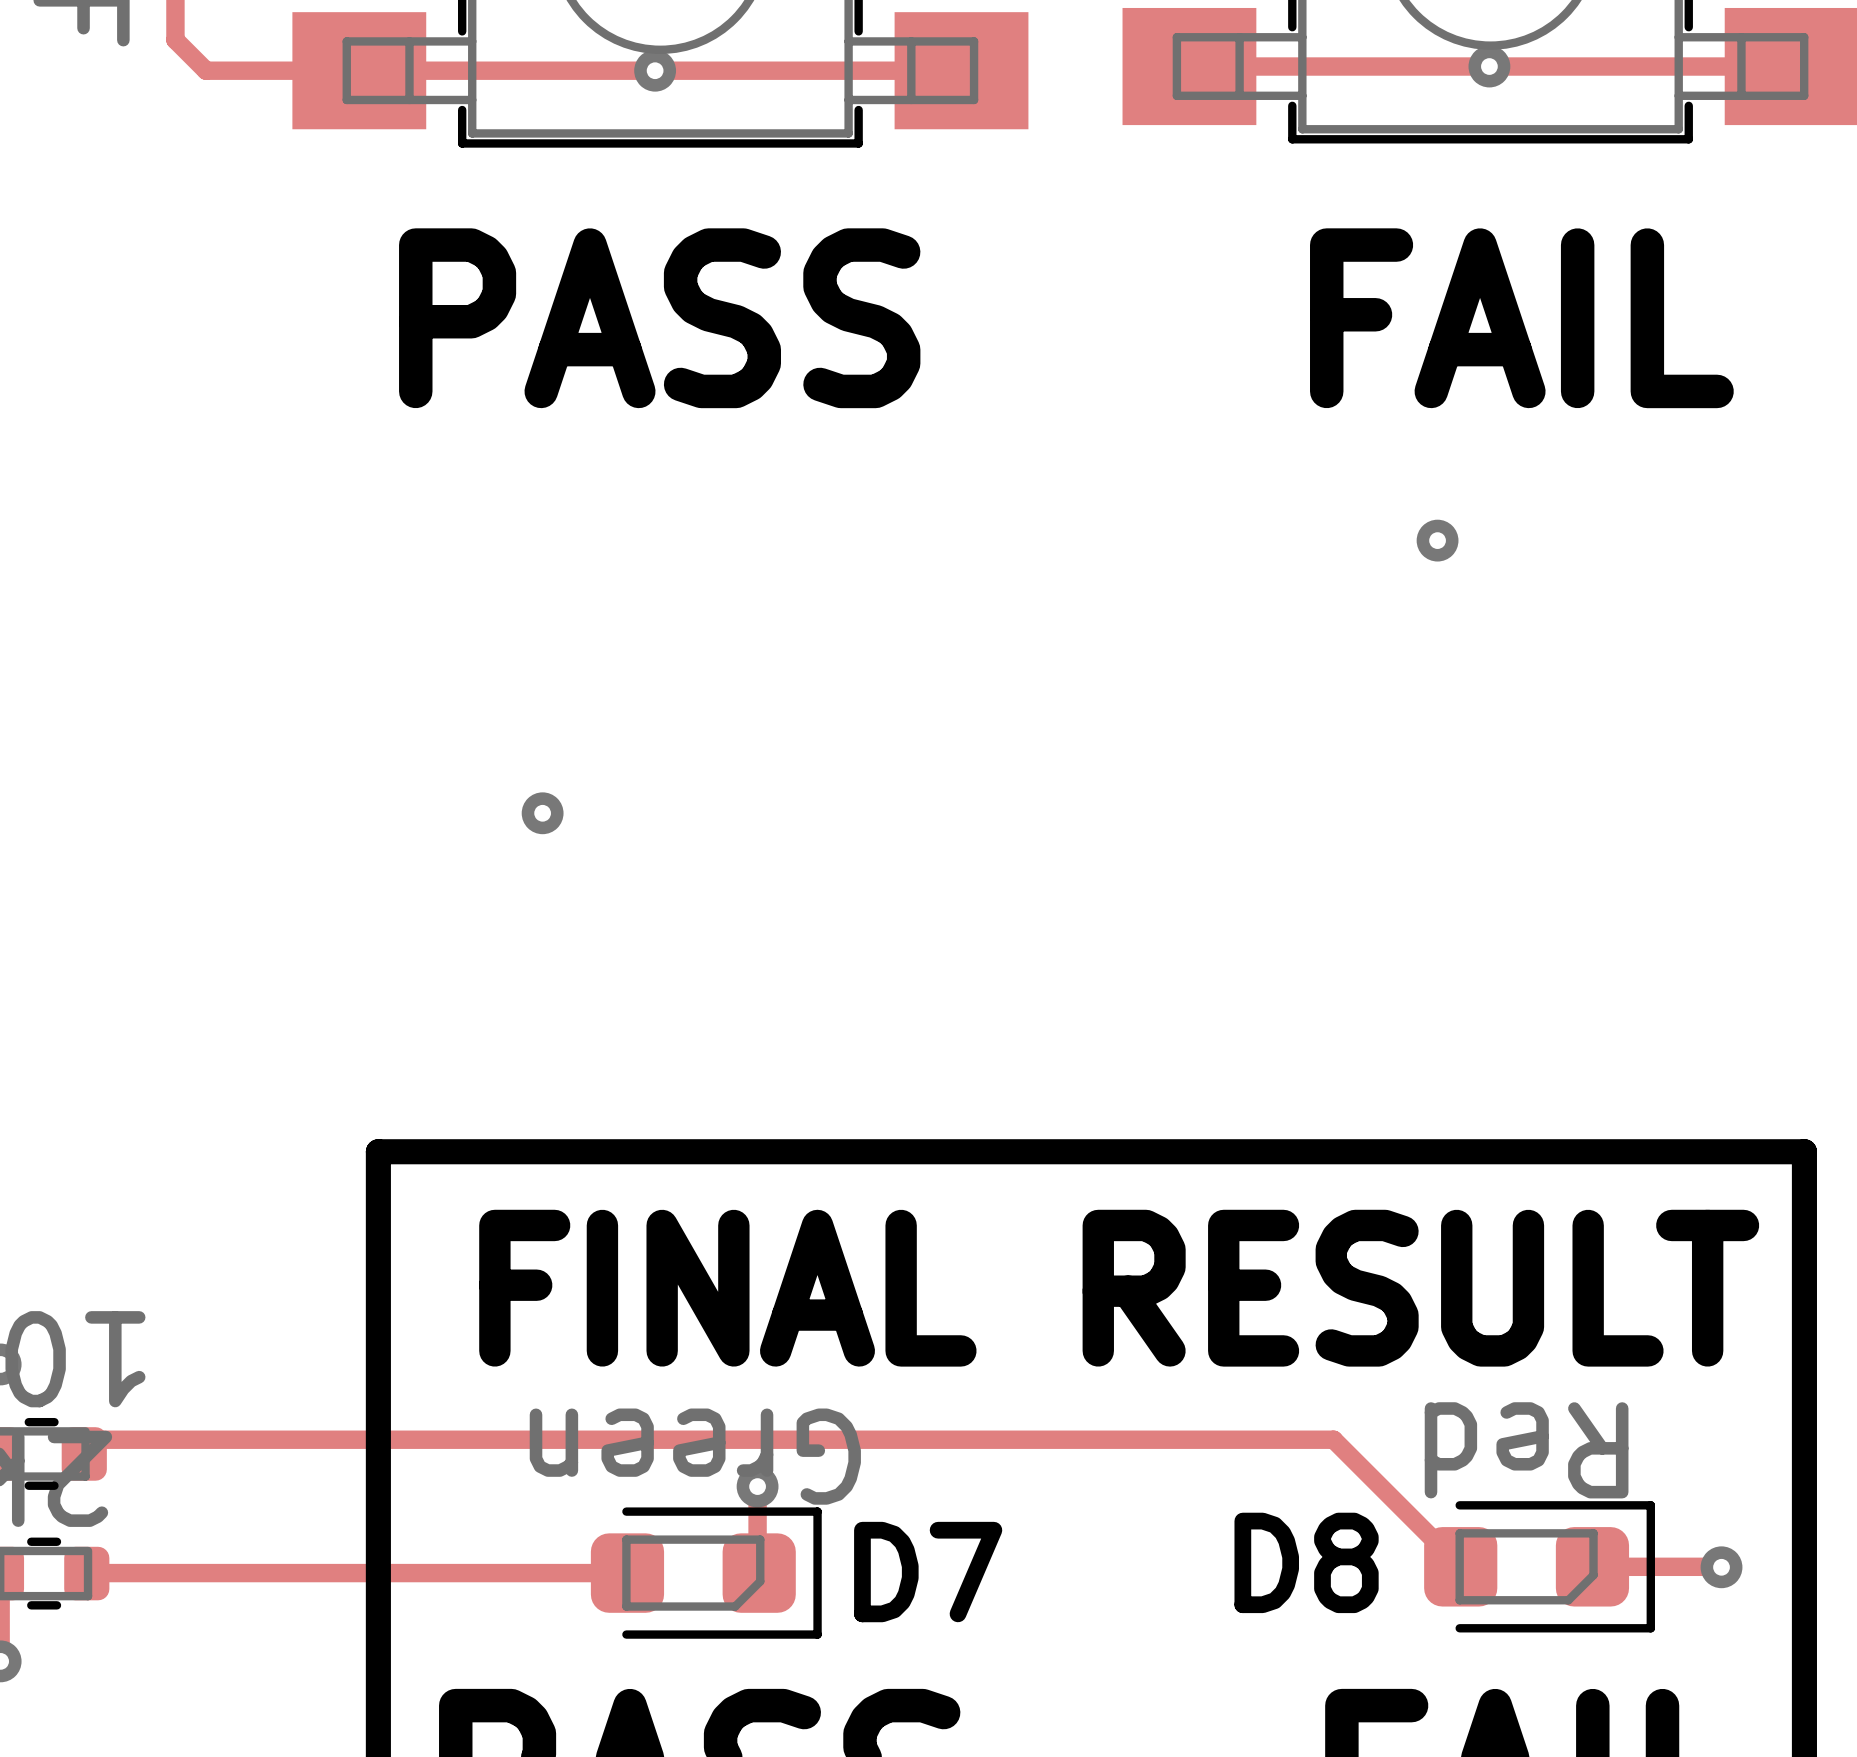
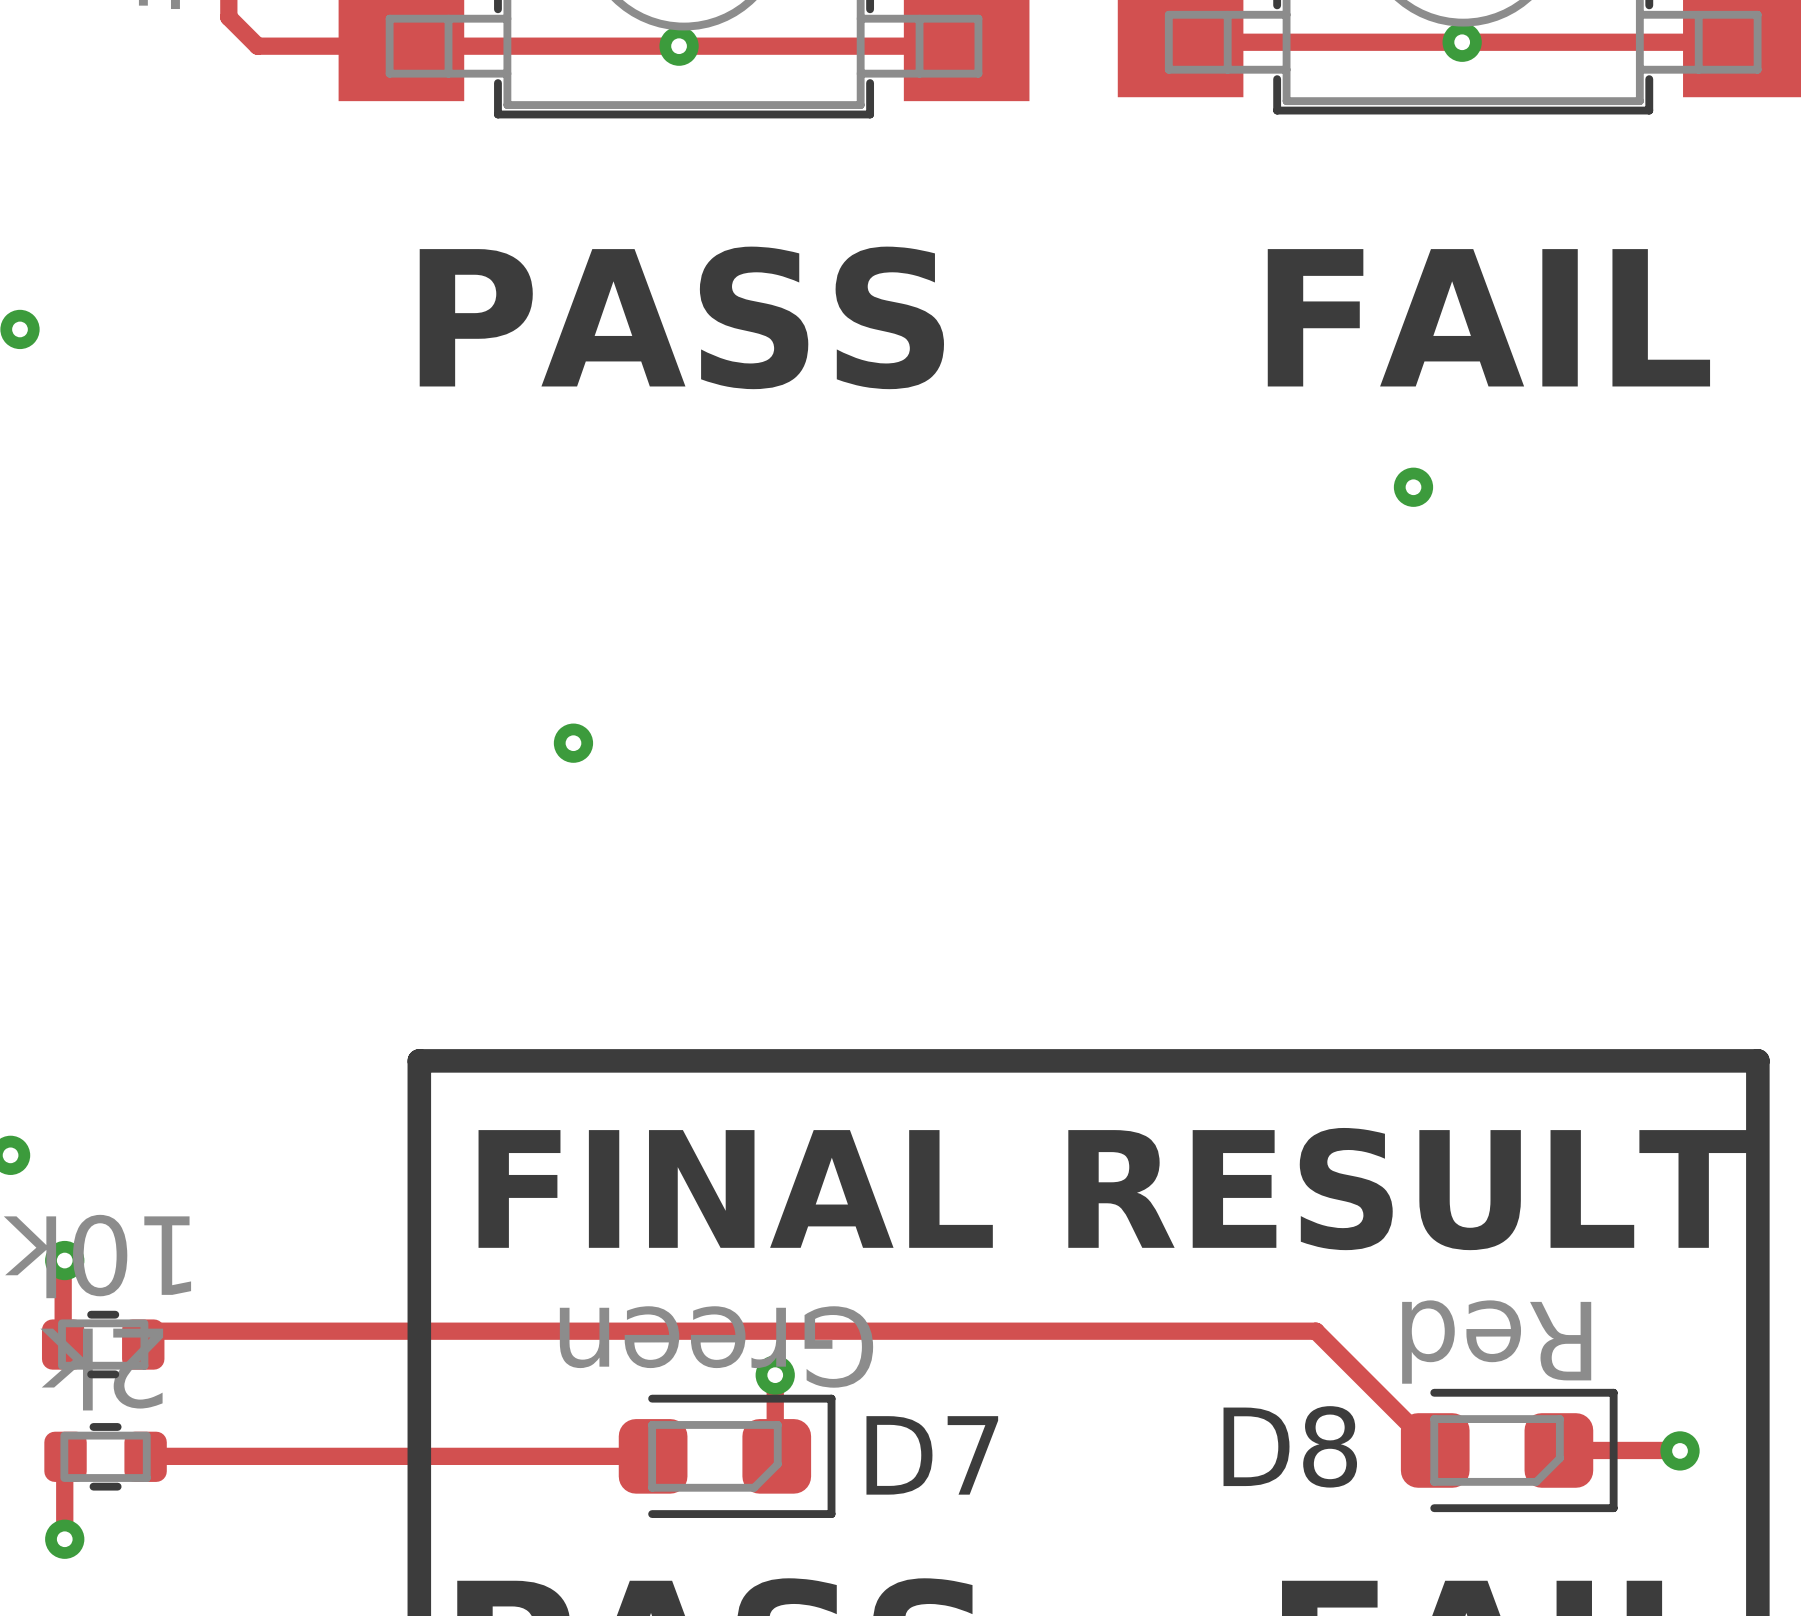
text position: PASS (659, 318) -> PASS (681, 317)
text position: FAIL (1521, 318) -> FAIL (1488, 317)

